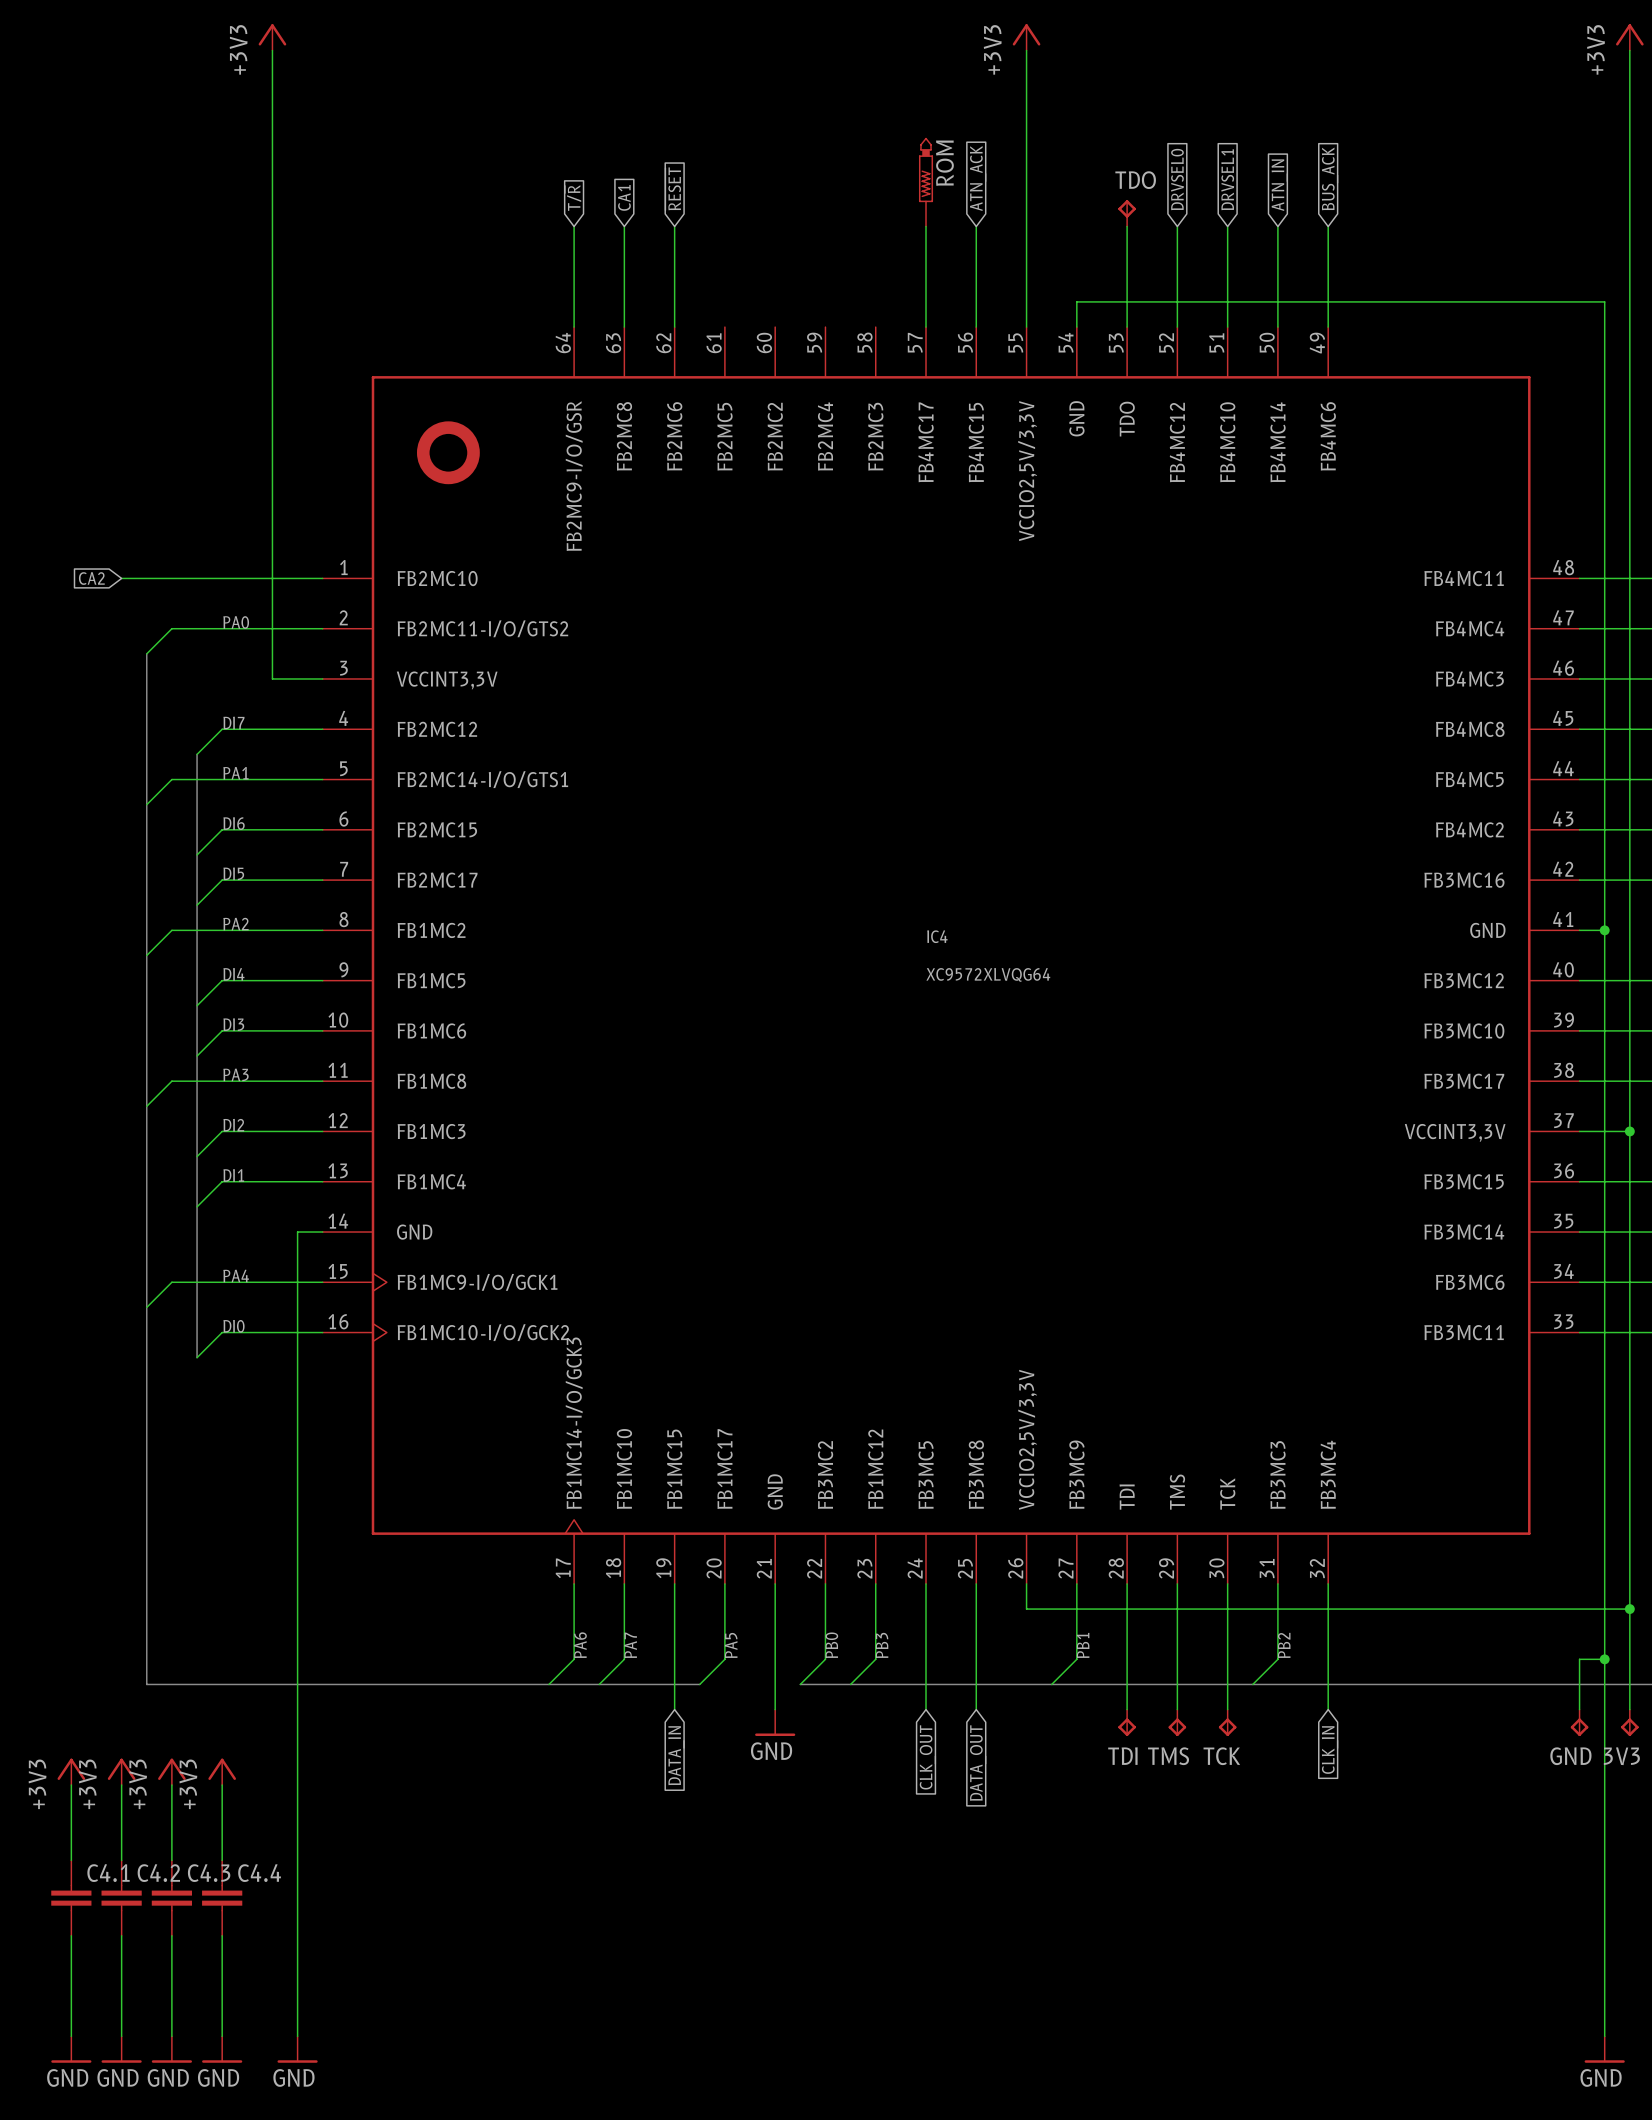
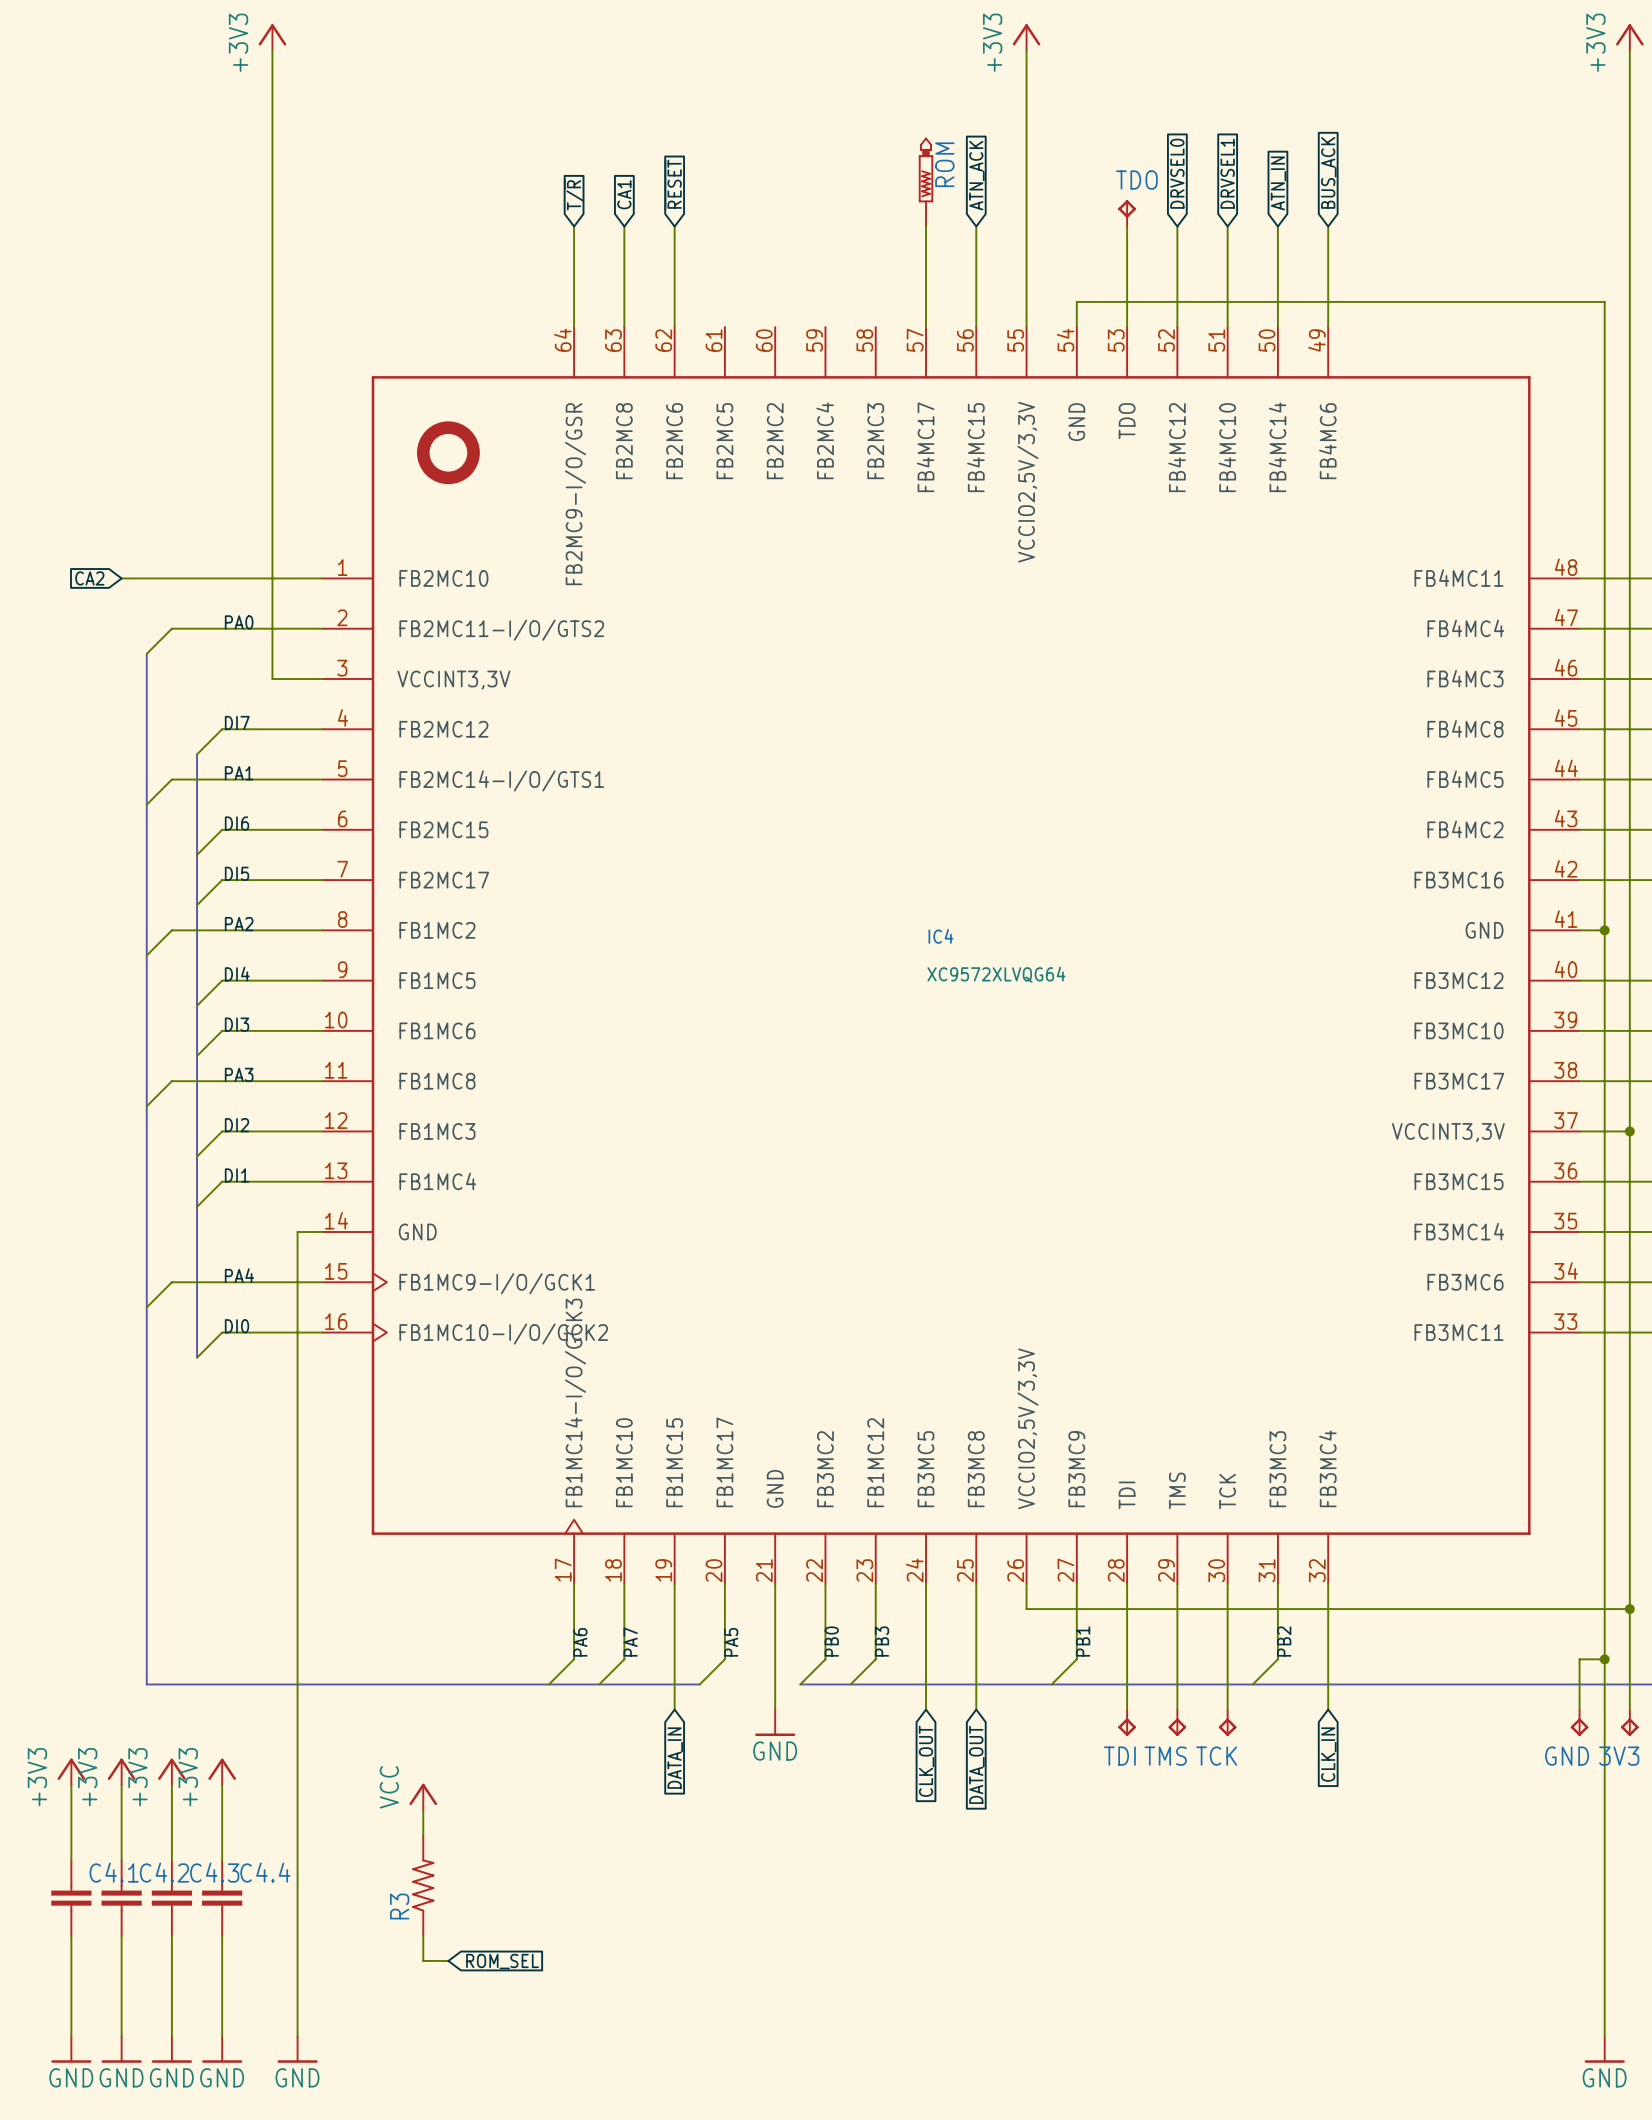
power symbol: none -> VCC (423, 1796)
wire: none -> (423, 1810) (423, 1835)
R3: none -> (423, 1885)
wire: none -> (423, 1935) (423, 1960) (448, 1960)
global label: none -> ROM_SEL (502, 1961)

